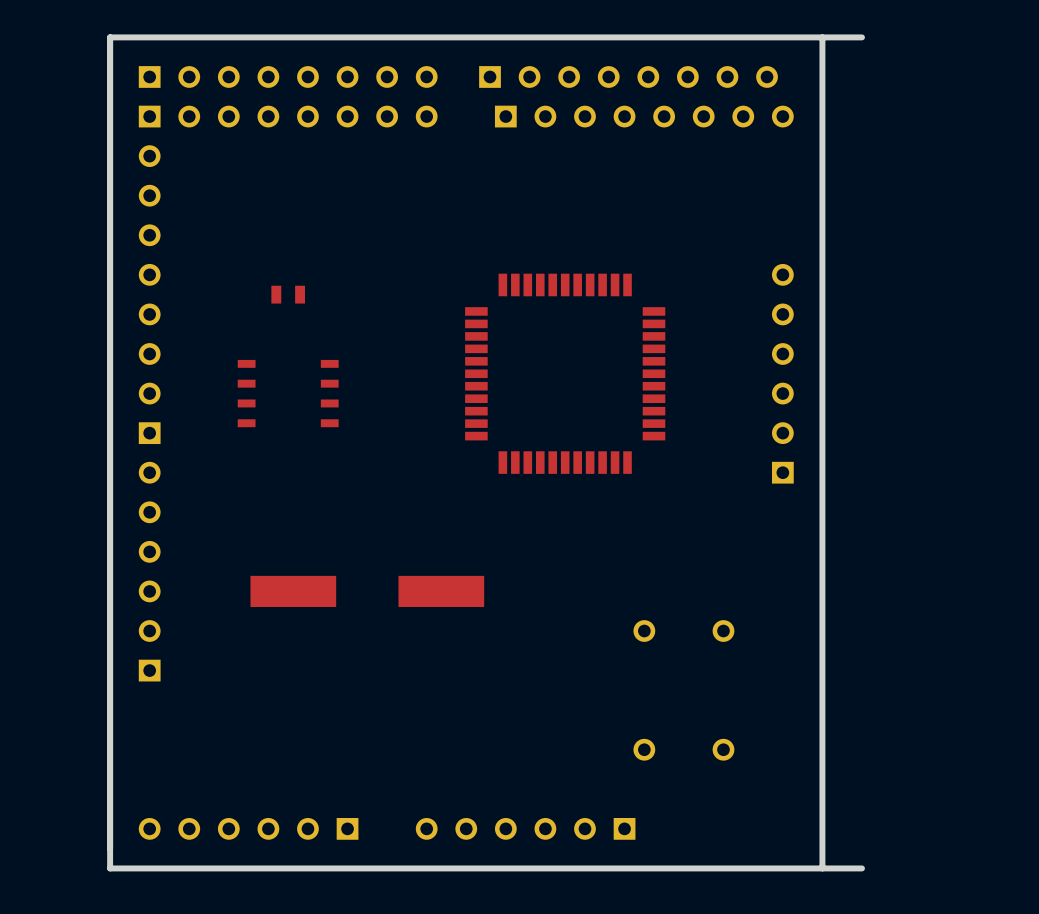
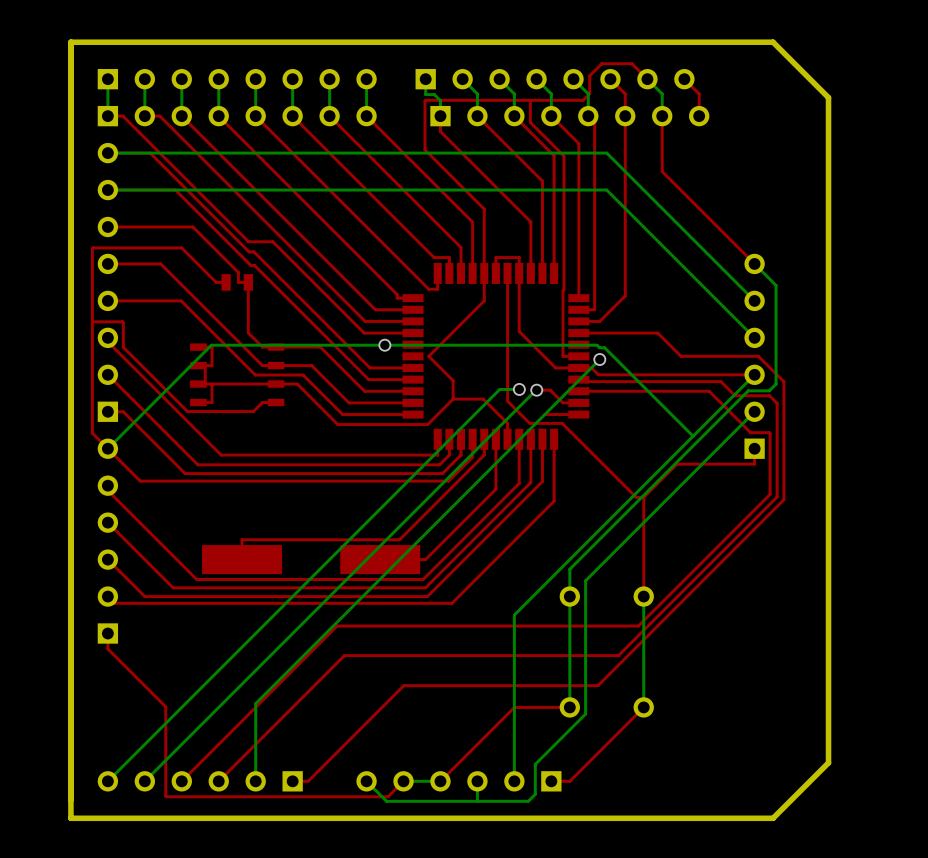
board edge: (822, 37) (822, 868) -> none
board edge: none -> (773, 42) (828, 97) (828, 762) (773, 818)
bottom track: none -> (107, 79) (107, 116)
bottom track: none -> (144, 79) (144, 116)
bottom track: none -> (181, 79) (181, 116)
bottom track: none -> (218, 79) (218, 116)
bottom track: none -> (255, 79) (255, 116)
bottom track: none -> (292, 79) (292, 116)
bottom track: none -> (329, 79) (329, 116)
bottom track: none -> (366, 79) (366, 116)
bottom track: none -> (425, 79) (425, 94) (434, 94) (440, 100) (440, 116)
bottom track: none -> (462, 79) (477, 93) (477, 116)
bottom track: none -> (499, 79) (514, 93) (514, 116)
bottom track: none -> (536, 79) (551, 93) (551, 116)
bottom track: none -> (573, 79) (588, 93) (588, 116)
top track: none -> (610, 79) (625, 93) (625, 295) (599, 321) (578, 321)
bottom track: none -> (647, 79) (662, 93) (662, 116)
top track: none -> (647, 79) (631, 63) (601, 63) (589, 75) (589, 93) (583, 100) (425, 101) (425, 149) (484, 209) (484, 300) (428, 356) (453, 380) (453, 399)
top track: none -> (684, 79) (699, 93) (699, 116)
top track: none -> (530, 100) (530, 122) (563, 156) (562, 356) (578, 356)
top track: none -> (107, 116) (123, 116) (248, 241) (272, 241) (364, 333) (412, 333)
top track: none -> (144, 116) (159, 116) (365, 321) (412, 321)
top track: none -> (181, 116) (375, 309) (412, 309)
top track: none -> (218, 116) (397, 294) (397, 298) (412, 298)
top track: none -> (255, 116) (428, 289) (437, 289) (437, 273)
top track: none -> (292, 116) (434, 257) (449, 257) (449, 273)
top track: none -> (329, 116) (460, 247) (460, 273)
top track: none -> (366, 116) (472, 222) (472, 273)
top track: none -> (440, 116) (440, 131) (530, 221) (530, 273)
top track: none -> (477, 116) (542, 181) (542, 273)
top track: none -> (514, 116) (554, 155) (554, 273)
top track: none -> (551, 116) (578, 143) (578, 298)
top track: none -> (588, 116) (594, 122) (594, 309) (578, 309)
top track: none -> (662, 116) (662, 171) (754, 263)
bottom track: none -> (107, 153) (606, 153) (754, 300)
top track: none -> (107, 153) (150, 153) (249, 251) (253, 251) (370, 367) (412, 367)
bottom track: none -> (107, 190) (606, 190) (754, 337)
top track: none -> (107, 190) (175, 190) (250, 265) (254, 265) (368, 379) (412, 379)
top track: none -> (107, 226) (192, 226) (238, 272) (238, 282) (248, 282) (248, 332) (262, 347) (320, 347) (364, 391) (412, 391)
top track: none -> (107, 263) (160, 263) (262, 365) (311, 365) (349, 402) (412, 402)
bottom track: none -> (754, 263) (776, 285) (776, 384) (769, 390) (748, 390) (569, 569) (569, 707)
top track: none -> (495, 273) (495, 257) (519, 257) (519, 331) (555, 367) (591, 367) (598, 374) (754, 374)
top track: none -> (507, 273) (507, 401) (529, 423) (562, 423) (636, 497) (643, 497)
top track: none -> (226, 282) (216, 282) (181, 247) (92, 248) (92, 433) (140, 481) (448, 481) (472, 457) (472, 439)
top track: none -> (107, 300) (181, 300) (255, 375) (303, 375) (342, 414) (412, 414)
top track: none -> (92, 321) (122, 321) (123, 347) (187, 411) (253, 411) (262, 402) (276, 402)
top track: none -> (578, 333) (657, 333) (681, 356) (758, 356) (783, 381) (783, 499) (597, 685) (403, 685) (308, 781) (292, 781)
top track: none -> (107, 337) (107, 341) (221, 455) (437, 455) (437, 439)
via: none -> (384, 345)
top track: none -> (198, 347) (212, 347) (212, 365) (198, 365)
part position: (782, 373) -> (754, 356)
bottom track: none -> (599, 359) (255, 703) (255, 781)
via: none -> (599, 359)
top track: none -> (205, 365) (205, 384)
top track: none -> (107, 374) (197, 464) (439, 464) (449, 455) (449, 439)
bottom track: none -> (754, 374) (693, 436)
top track: none -> (578, 379) (580, 381) (720, 381) (735, 395) (769, 395) (777, 403) (777, 496) (618, 655) (344, 655) (218, 781)
top track: none -> (198, 384) (297, 384) (337, 424) (427, 424) (453, 399)
top track: none -> (212, 384) (212, 402) (198, 402)
bottom track: none -> (519, 389) (499, 389) (107, 781)
via: none -> (519, 389)
bottom track: none -> (536, 390) (144, 781)
top track: none -> (536, 390) (550, 390) (562, 402) (578, 402)
via: none -> (536, 390)
top track: none -> (578, 391) (709, 391) (750, 432) (770, 433) (770, 494) (638, 626) (337, 626) (181, 781)
top track: none -> (453, 399) (483, 399) (507, 423) (507, 439)
top track: none -> (107, 411) (123, 411) (185, 473) (442, 473) (460, 455) (460, 439)
bottom track: none -> (754, 411) (585, 580) (585, 714) (535, 764) (535, 794) (528, 801) (386, 801) (366, 781)
top track: none -> (578, 414) (544, 414)
bottom track: none -> (693, 436) (514, 615) (514, 781)
bottom track: none -> (693, 436) (604, 347) (599, 347) (597, 345) (211, 345) (107, 448)
top track: none -> (484, 439) (484, 455) (399, 539) (242, 539) (242, 559)
top track: none -> (495, 439) (495, 489) (425, 559) (380, 559)
top track: none -> (519, 439) (519, 483) (423, 579) (196, 579) (107, 490) (107, 485)
top track: none -> (530, 439) (530, 482) (425, 587) (173, 587) (107, 522)
top track: none -> (542, 439) (542, 481) (427, 596) (144, 596) (107, 559)
top track: none -> (554, 439) (554, 501) (451, 603) (114, 603) (107, 596)
top track: none -> (754, 448) (754, 464) (676, 464) (643, 497)
top track: none -> (643, 497) (643, 596)
bottom track: none -> (643, 596) (643, 707)
top track: none -> (107, 633) (107, 648) (165, 706) (166, 796) (388, 796) (403, 781)
top track: none -> (569, 707) (514, 707) (440, 781)
top track: none -> (643, 707) (569, 781) (551, 781)
bottom track: none -> (440, 781) (403, 781)
bottom track: none -> (477, 781) (477, 801)

